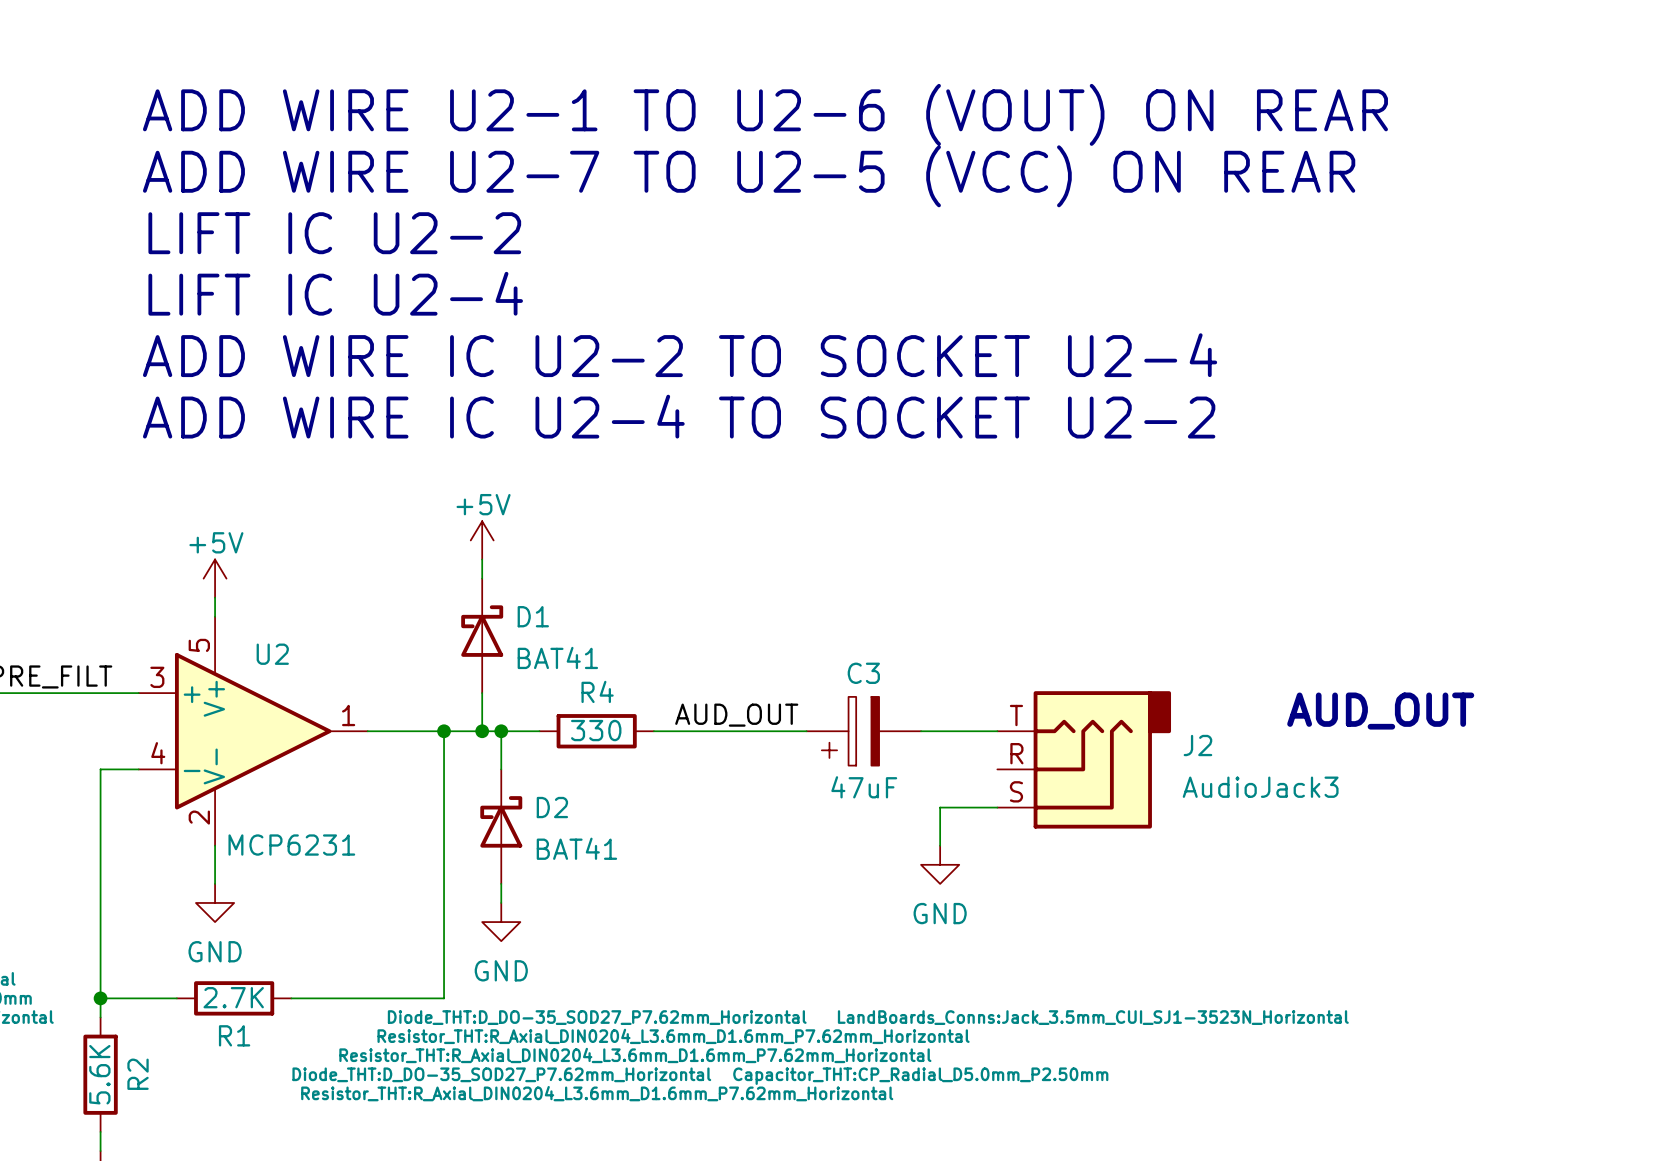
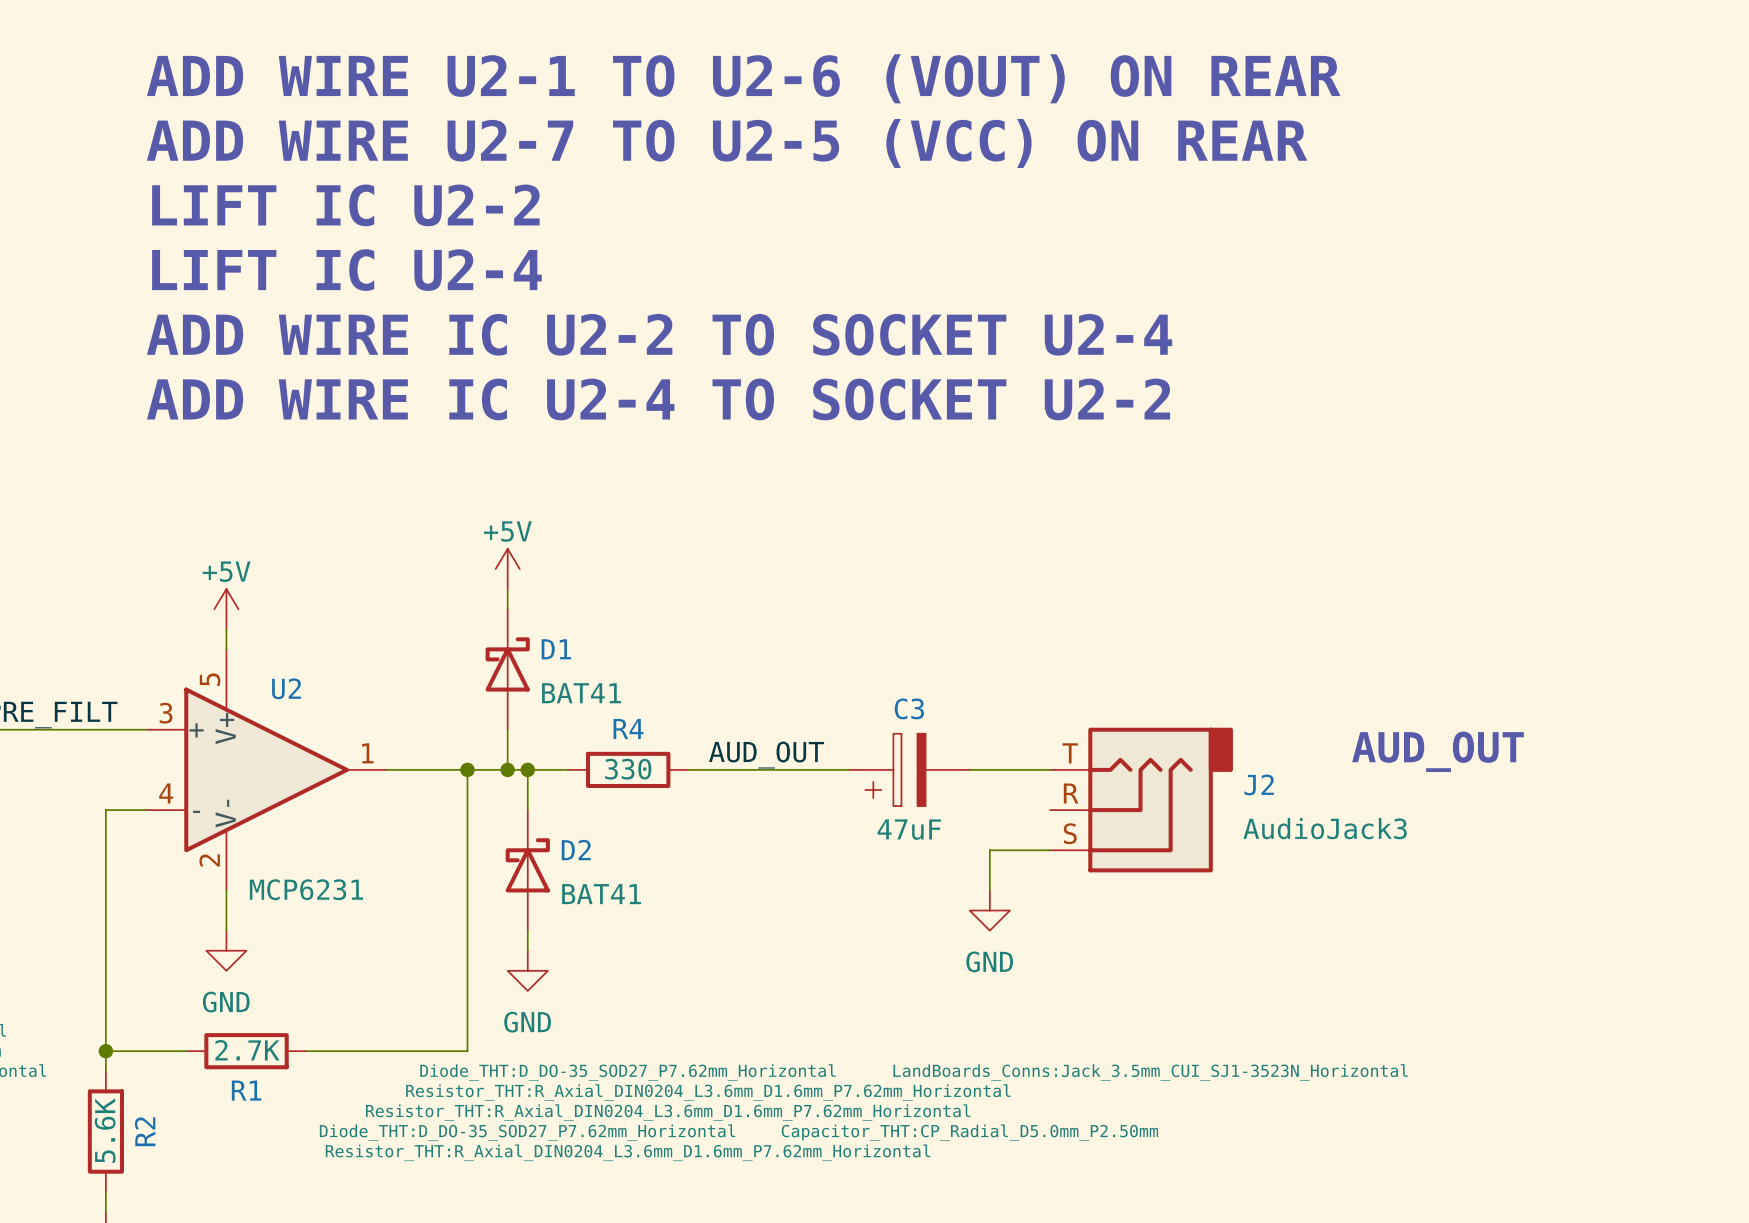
text position: ADD WIRE U2-1 TO U2-6 (VOUT) ON REAR (765, 114) -> ADD WIRE U2-1 TO U2-6 (VOUT) ON REAR (743, 78)
text position: ADD WIRE U2-7 TO U2-5 (VCC) ON REAR (749, 176) -> ADD WIRE U2-7 TO U2-5 (VCC) ON REAR (727, 143)
text position: LIFT IC U2-2 (334, 233) -> LIFT IC U2-2 (345, 205)
text position: LIFT IC U2-4 (335, 293) -> LIFT IC U2-4 (346, 270)
text position: ADD WIRE IC U2-2 TO SOCKET U2-4 (680, 355) -> ADD WIRE IC U2-2 TO SOCKET U2-4 (659, 334)
text position: ADD WIRE IC U2-4 TO SOCKET U2-2 (679, 416) -> ADD WIRE IC U2-4 TO SOCKET U2-2 (658, 399)

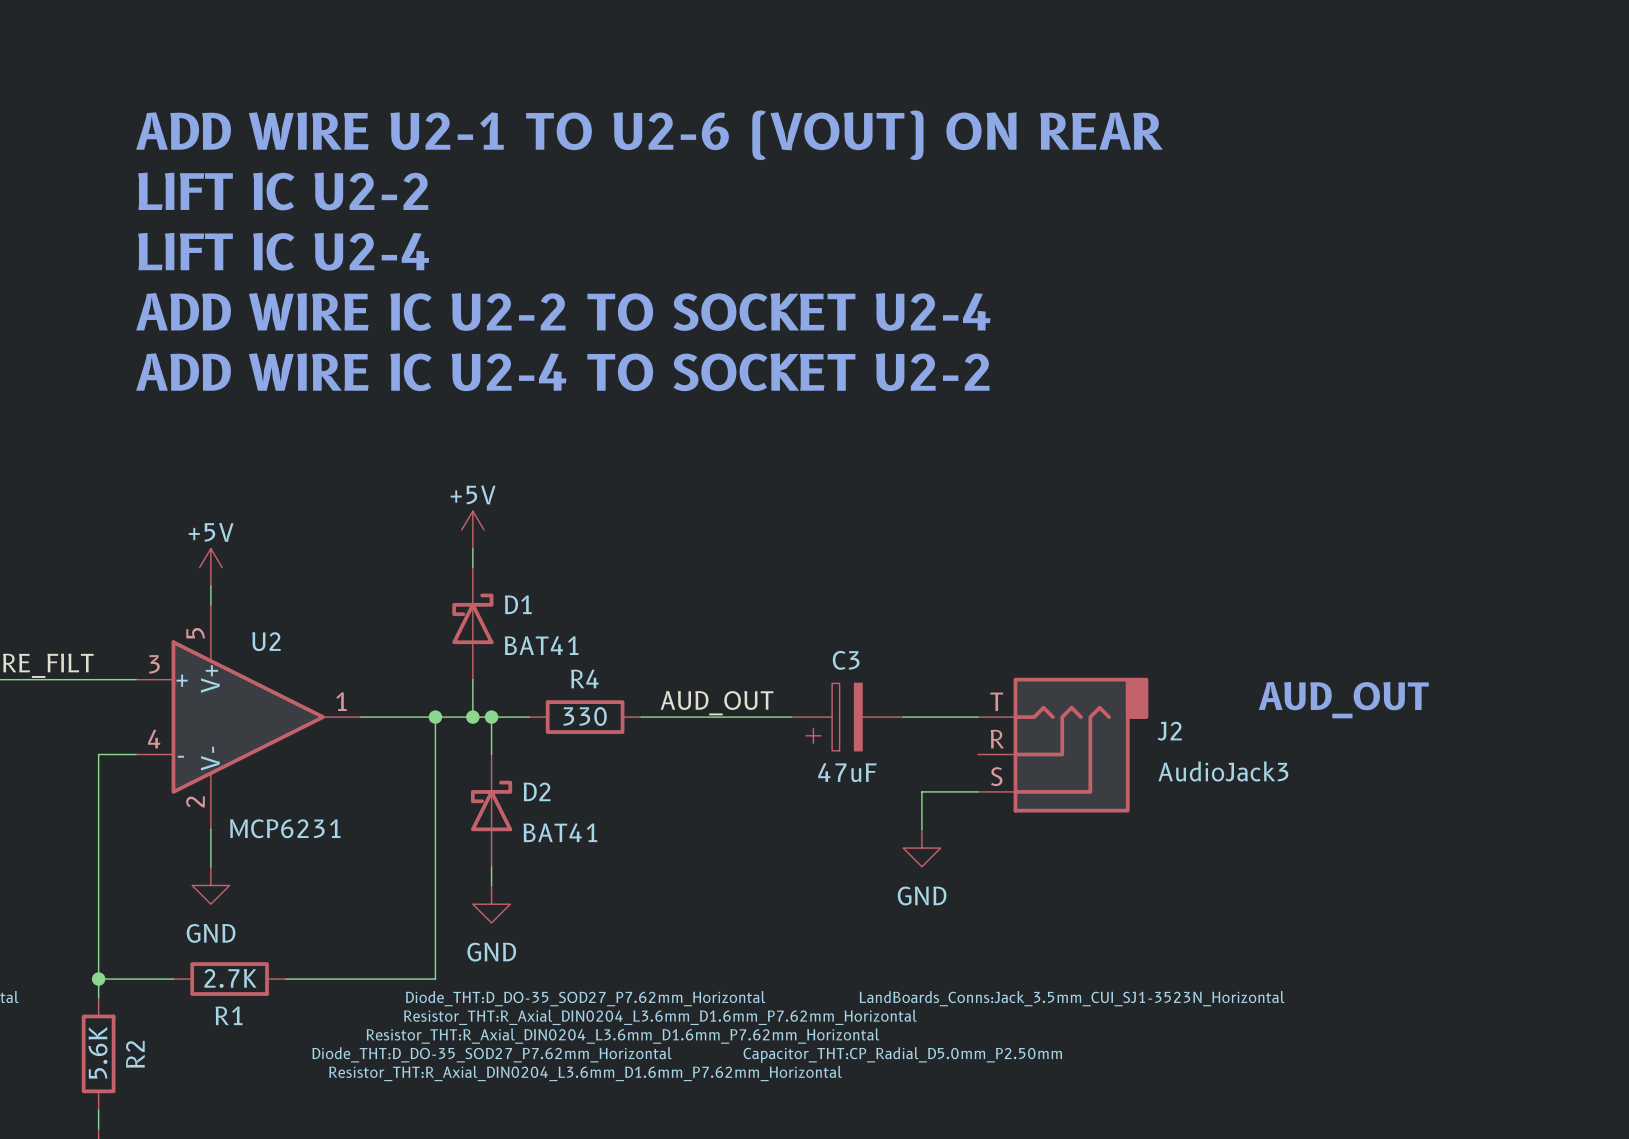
text: ADD WIRE U2-1 TO U2-6 (VOUT) ON REAR (743, 78) -> none
text: ADD WIRE U2-7 TO U2-5 (VCC) ON REAR (727, 143) -> ADD WIRE U2-1 TO U2-6 (VOUT) ON REAR (649, 135)

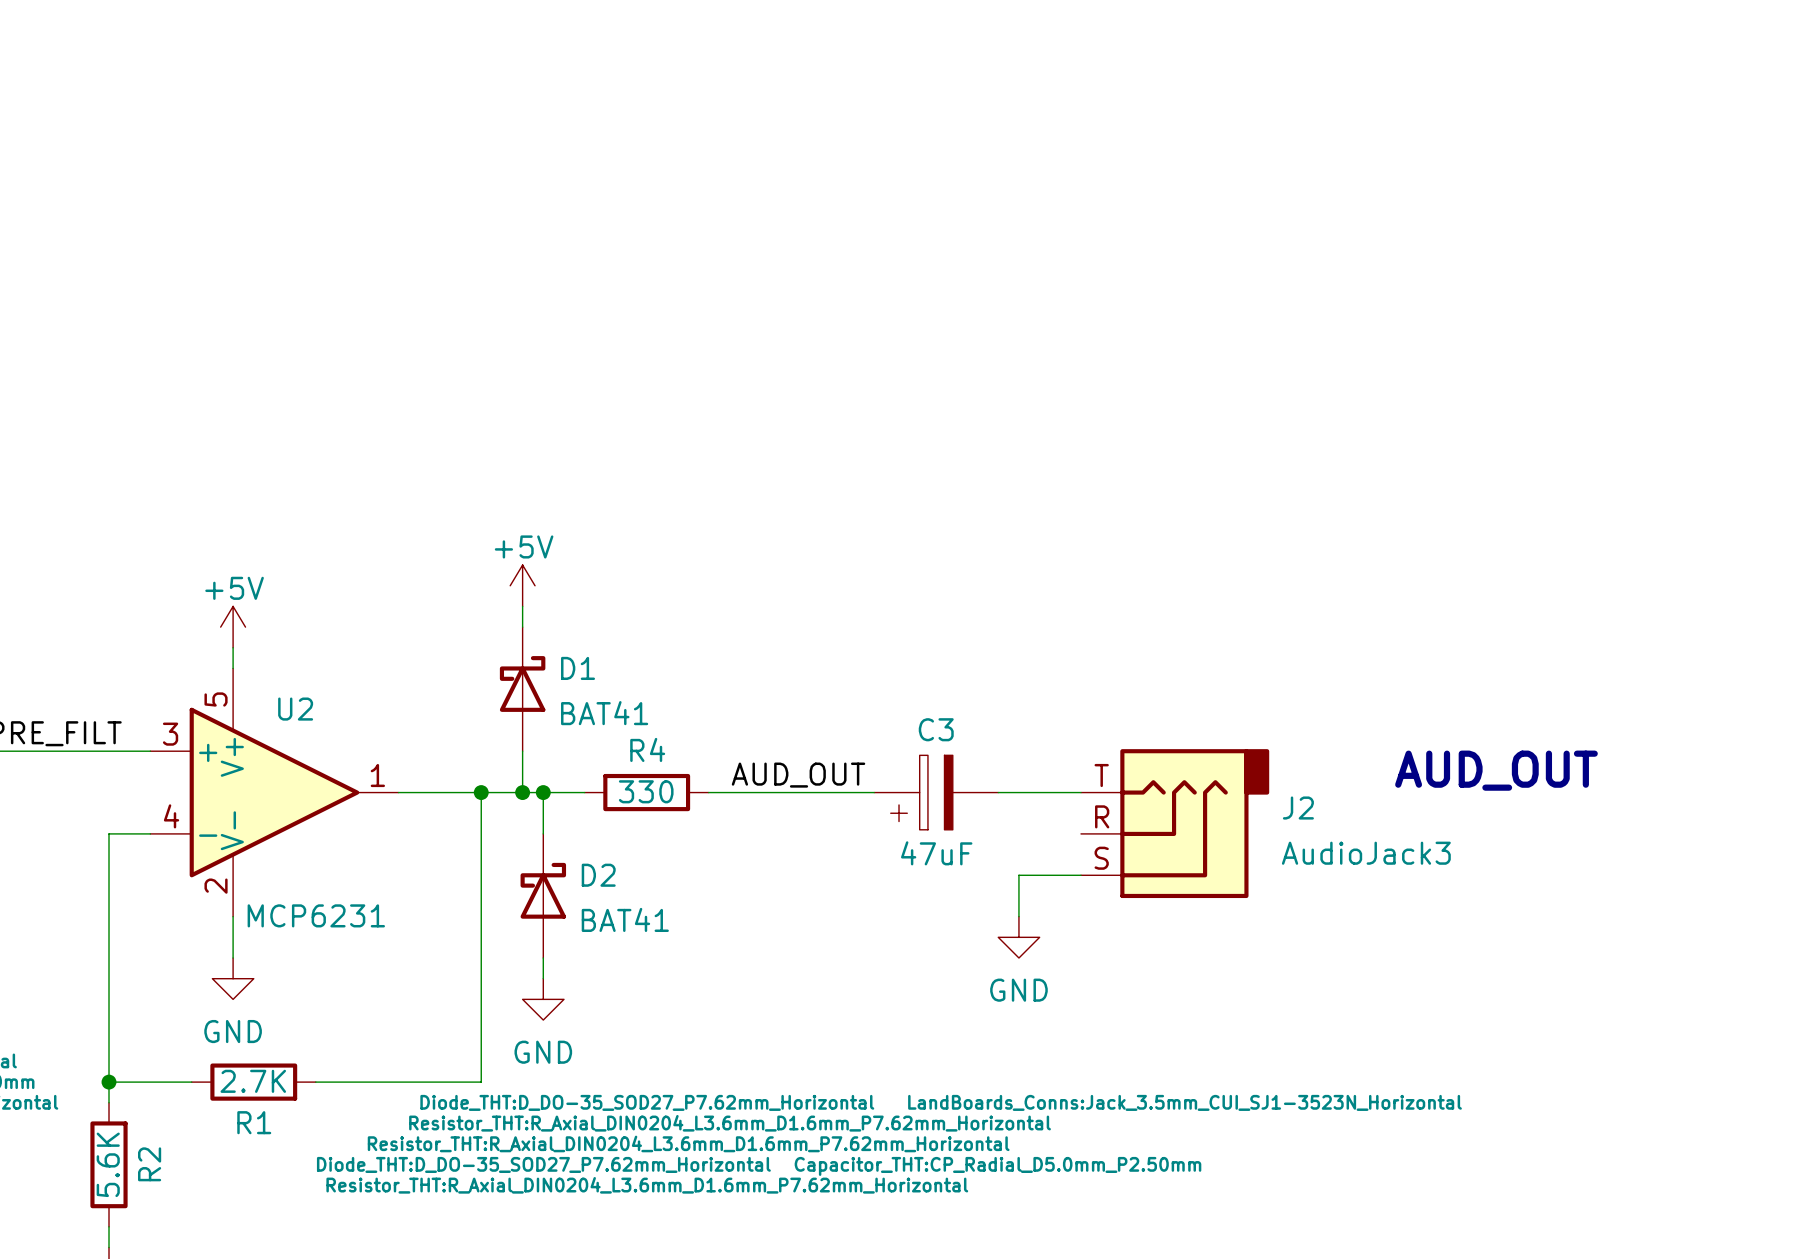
text: ADD WIRE U2-1 TO U2-6 (VOUT) ON REAR (649, 135) -> none
text: LIFT IC U2-2 (283, 191) -> none
text: LIFT IC U2-4 (283, 251) -> none
text: ADD WIRE IC U2-2 TO SOCKET U2-4 (563, 311) -> none
text: ADD WIRE IC U2-4 TO SOCKET U2-2 (562, 372) -> none

